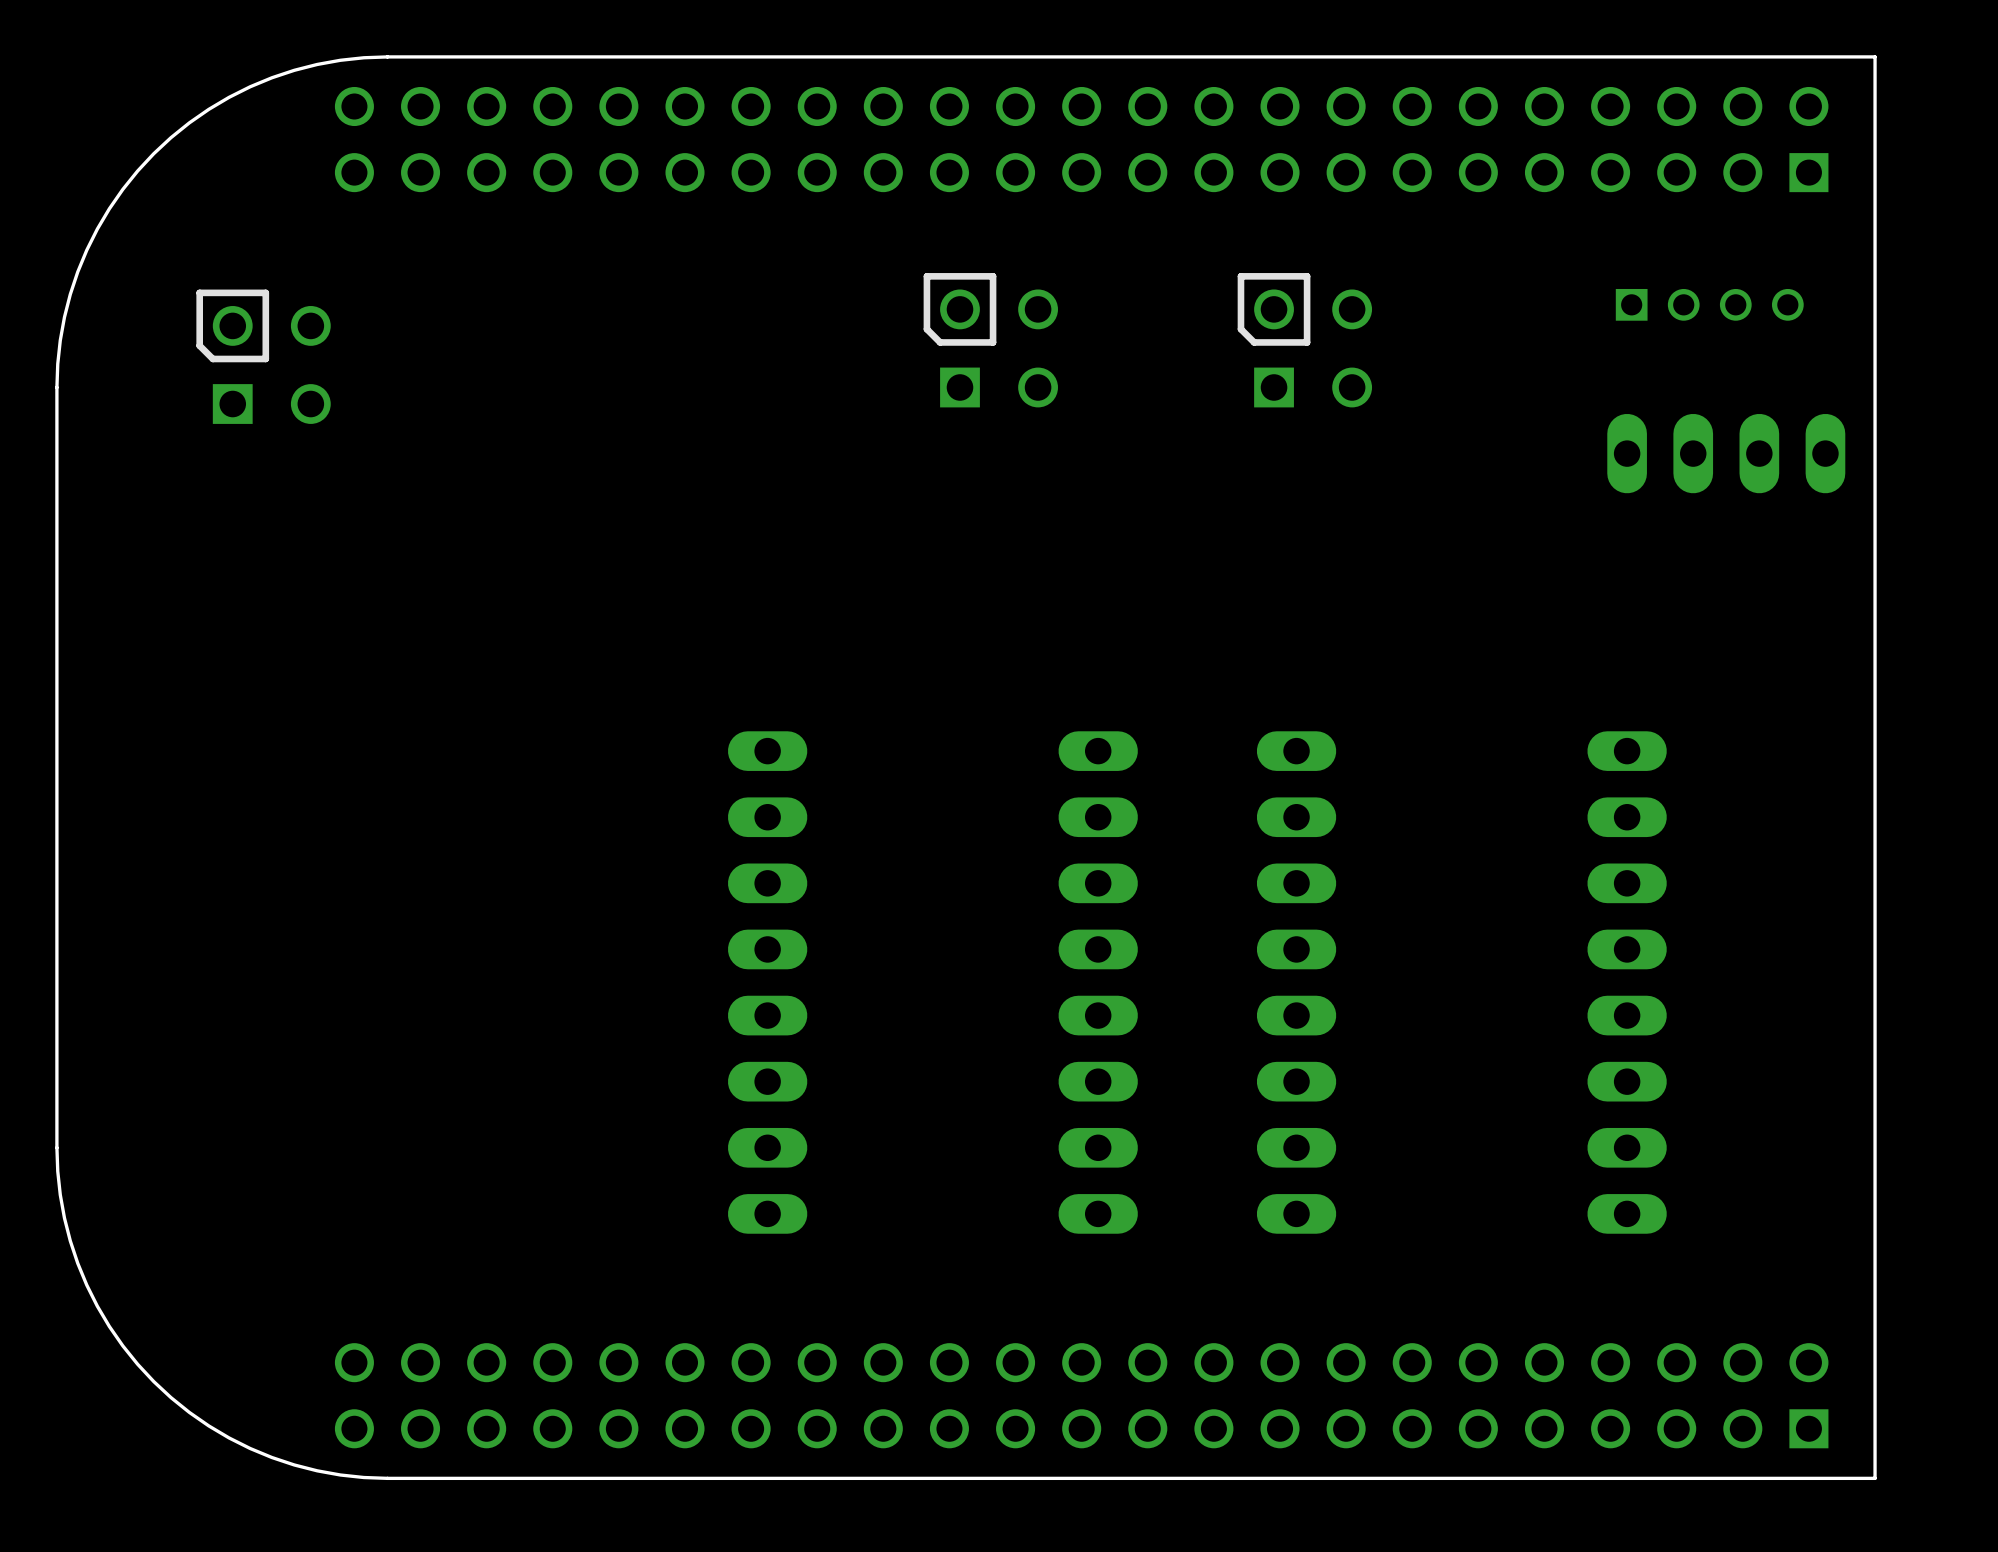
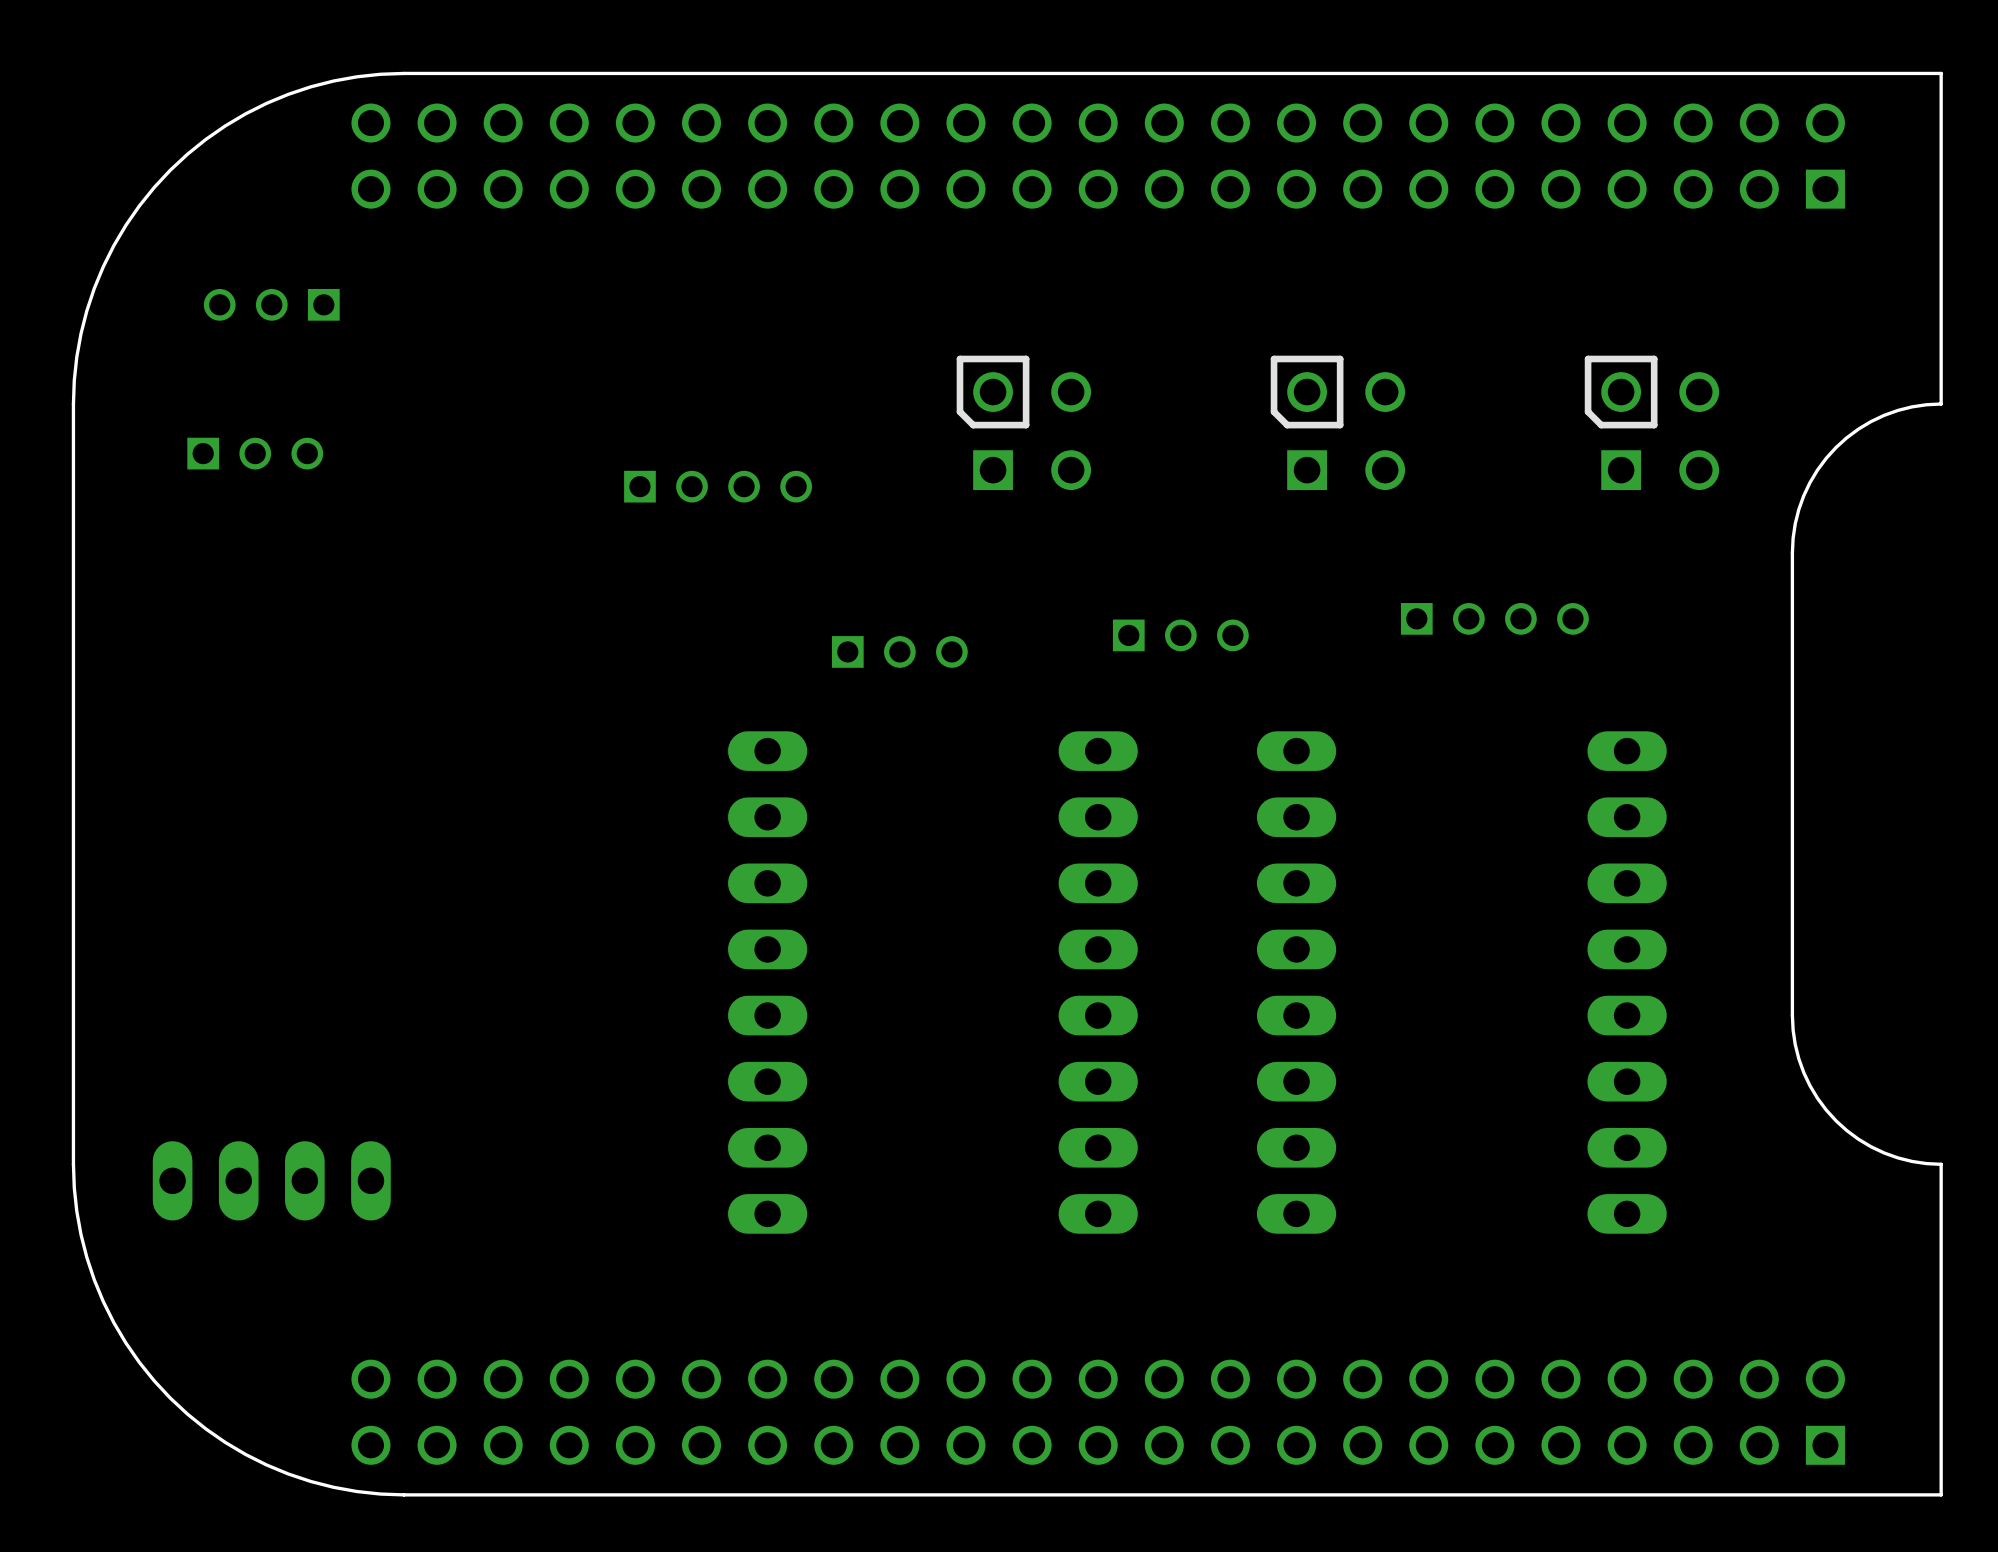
part: none -> (271, 304)
part position: (1709, 304) -> (1494, 618)
part position: (990, 340) -> (1023, 422)
part position: (1304, 340) -> (1337, 422)
part: (263, 356) -> none
part: none -> (1651, 422)
part: none -> (255, 453)
part: (1726, 453) -> none
part: none -> (718, 486)
part: none -> (1180, 635)
part: none -> (899, 651)
part: (965, 767) -> none
part: none -> (1007, 784)
part: none -> (271, 1180)

